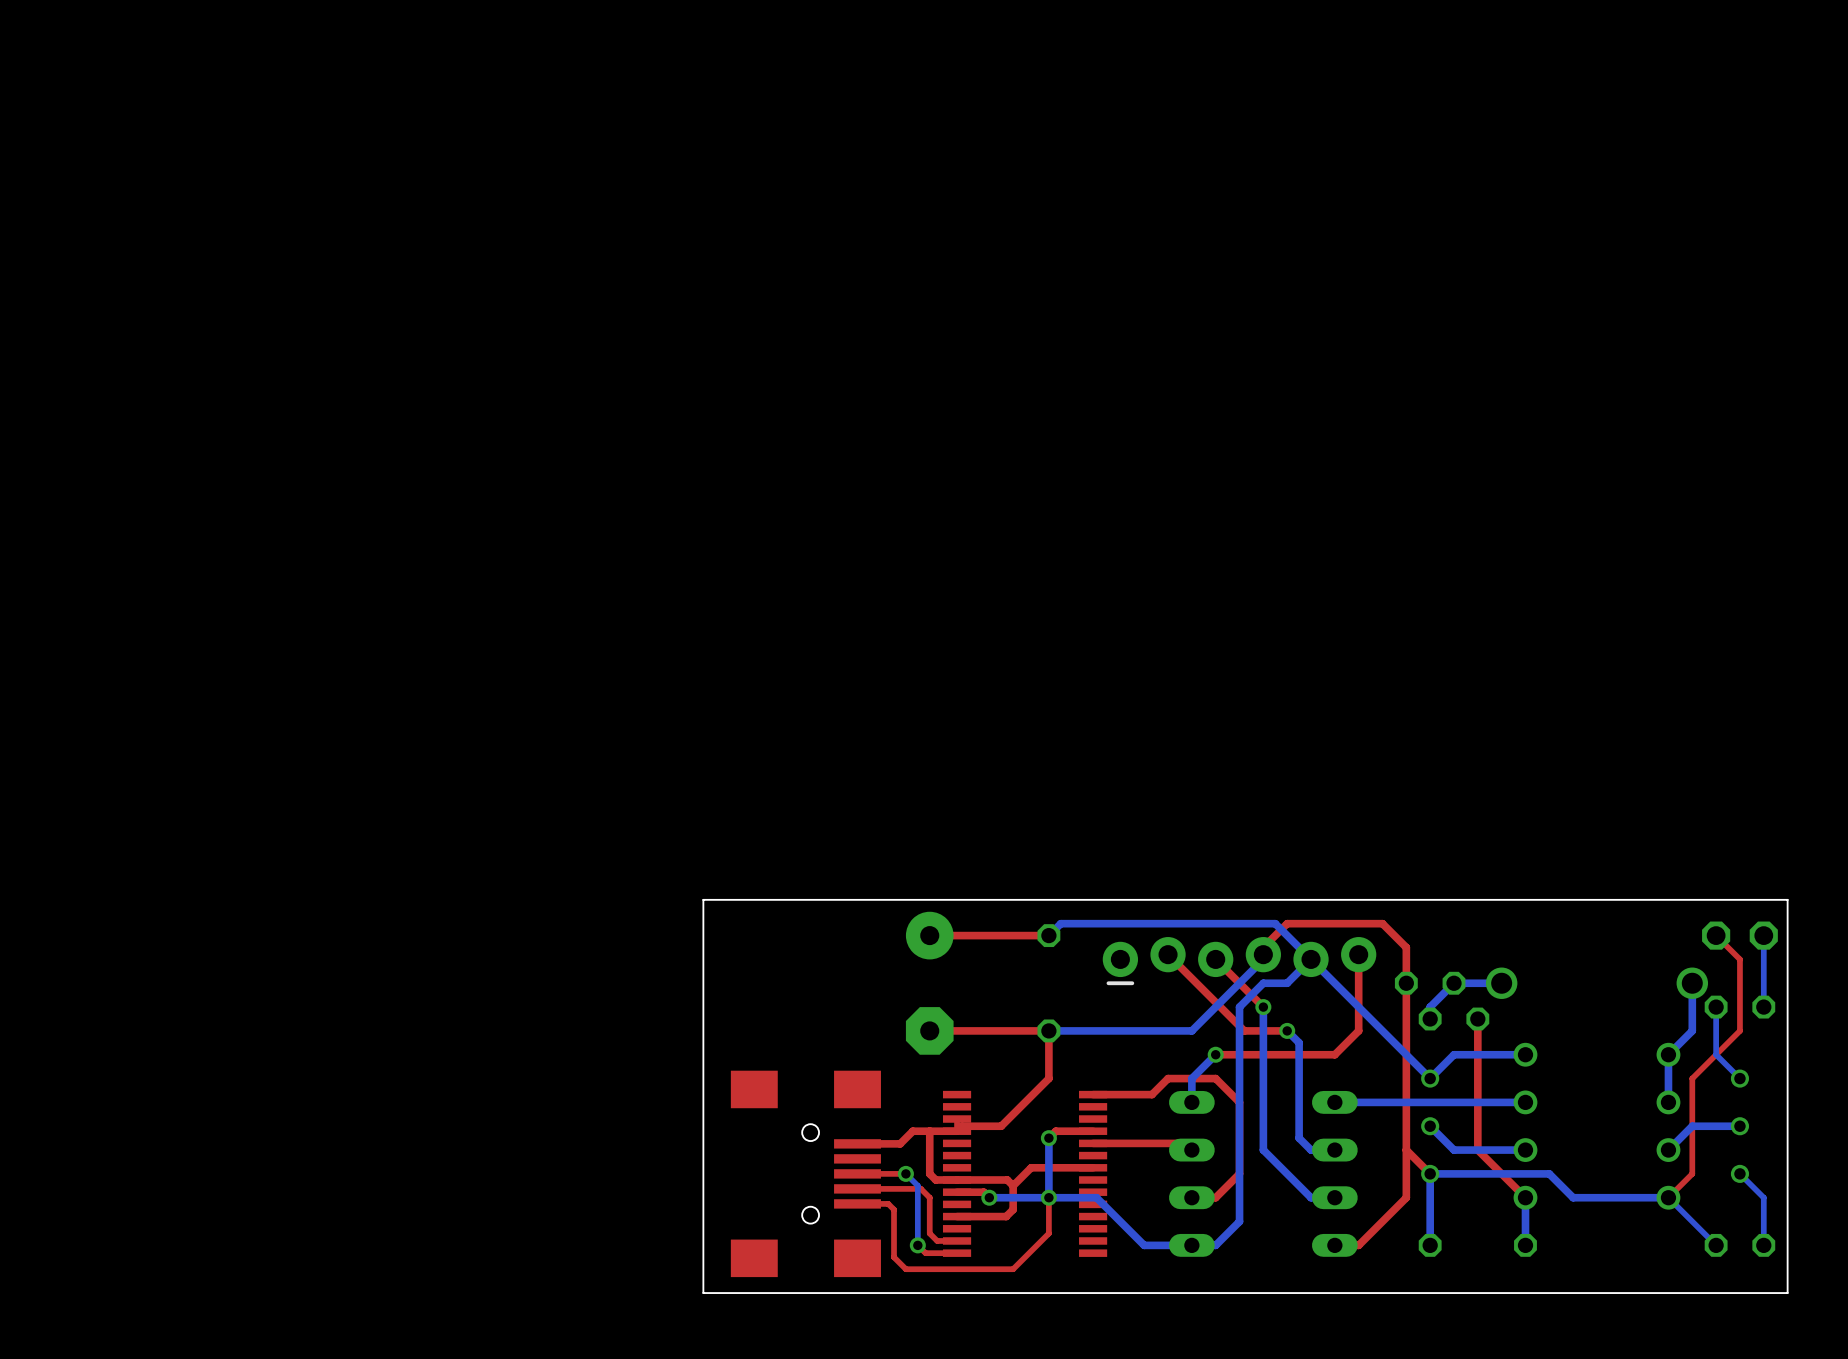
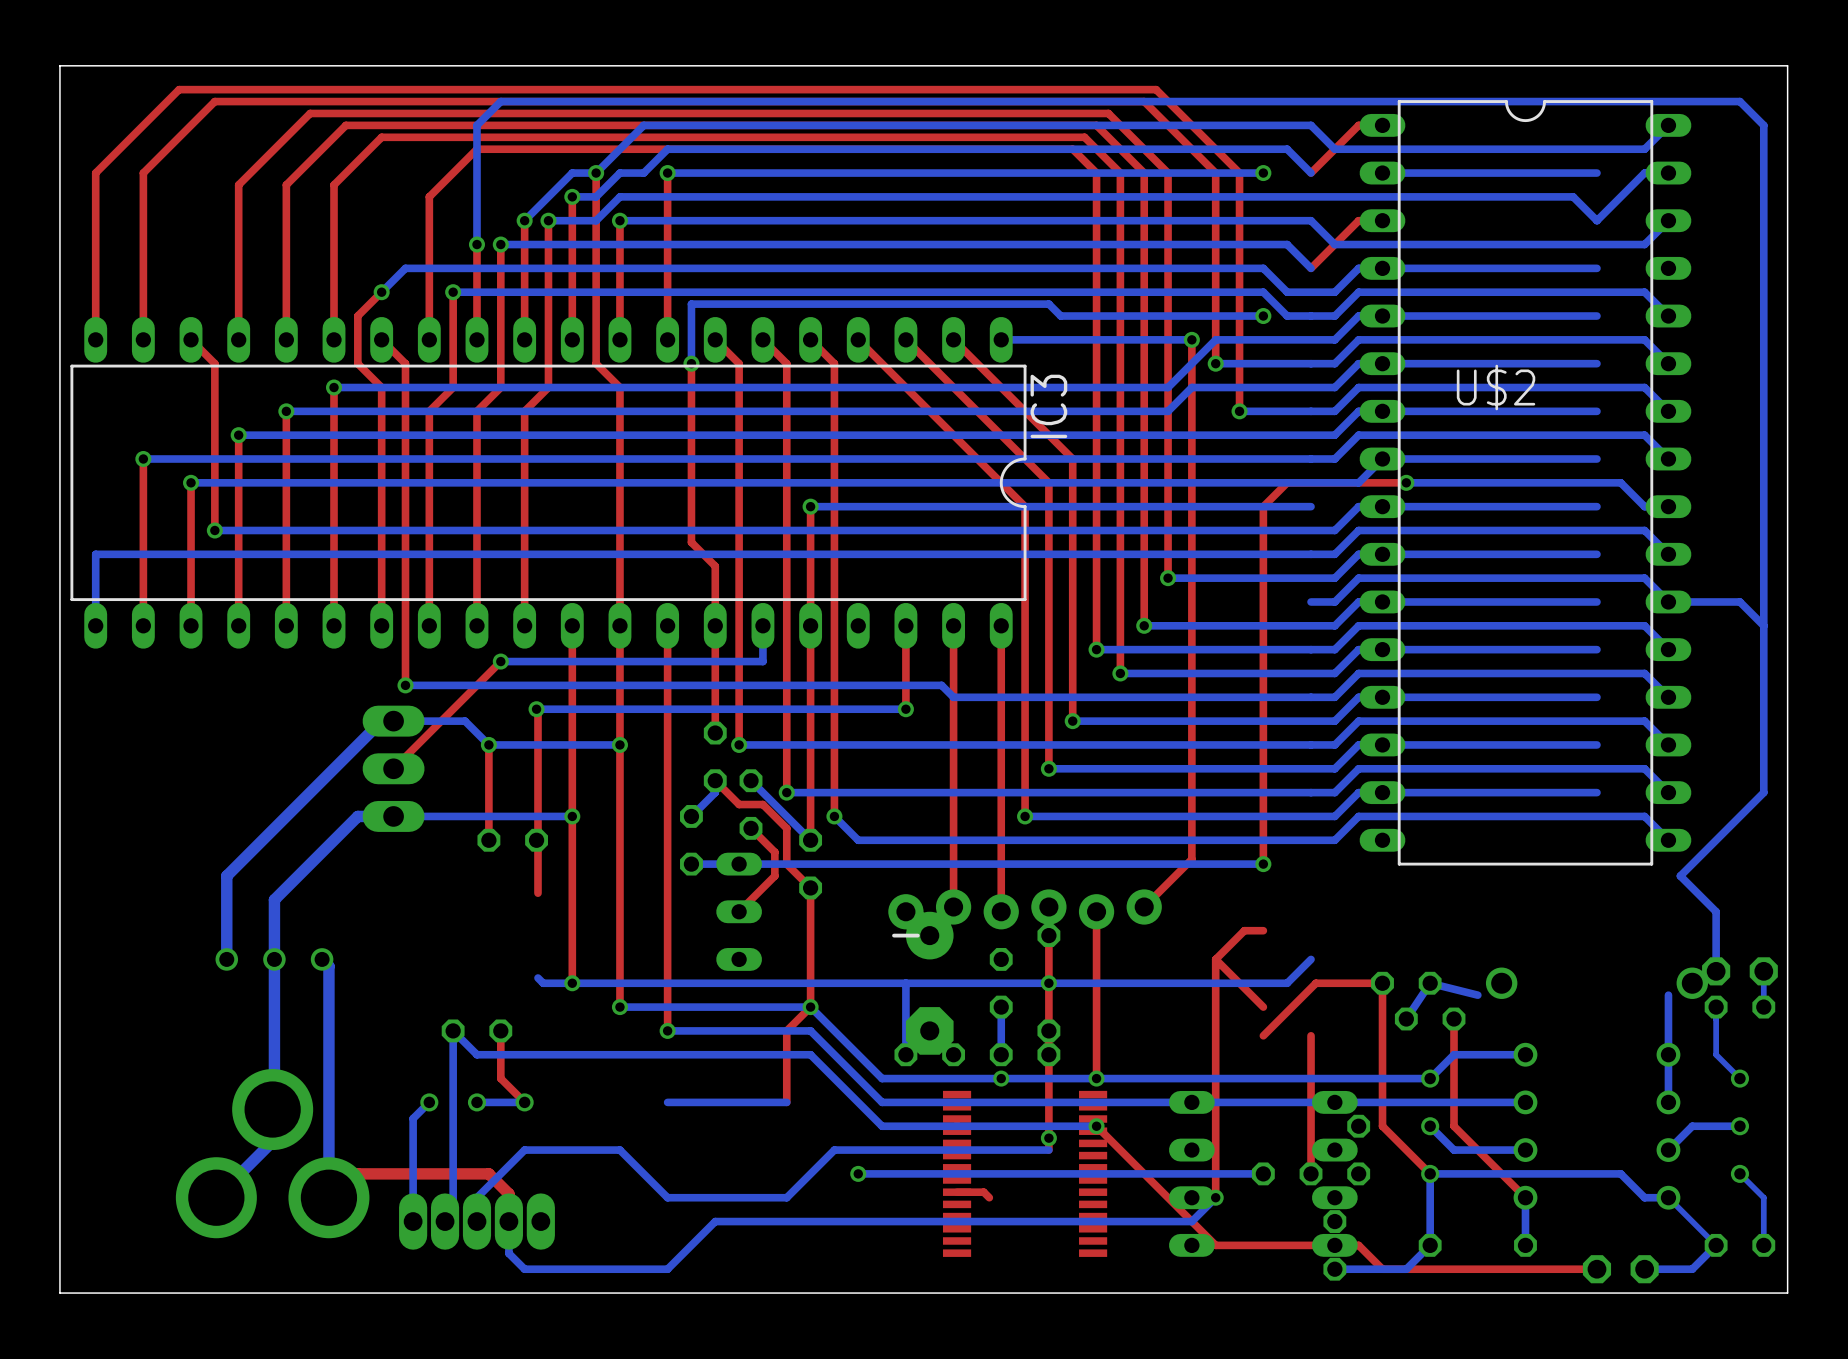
top track: none -> (1382, 125) (1358, 125) (1311, 173)
bottom track: none -> (1668, 125) (1644, 149) (1334, 149) (1311, 125) (643, 125) (596, 173) (572, 173) (524, 220)
top track: none -> (596, 173) (596, 363) (619, 387) (619, 1007)
via: none -> (596, 173)
top track: none -> (667, 173) (667, 339)
via: none -> (667, 173)
bottom track: none -> (1263, 173) (667, 173)
via: none -> (1263, 173)
bottom track: none -> (1311, 173) (1287, 149) (667, 149) (643, 173) (619, 173) (596, 196) (572, 196)
bottom track: none -> (1596, 173) (1382, 173)
bottom track: none -> (1668, 173) (1644, 173) (1596, 220) (1573, 196) (619, 196) (596, 220) (548, 220)
top track: none -> (572, 196) (572, 339)
via: none -> (572, 196)
top track: none -> (524, 220) (524, 339)
via: none -> (524, 220)
top track: none -> (548, 220) (548, 387) (524, 411) (524, 625)
via: none -> (548, 220)
top track: none -> (619, 220) (619, 339)
via: none -> (619, 220)
top track: none -> (1382, 220) (1358, 220) (1311, 268)
bottom track: none -> (1668, 220) (1644, 244) (1334, 244) (1311, 220) (619, 220)
bottom track: none -> (476, 244) (476, 125) (500, 101) (1739, 101) (1763, 125) (1763, 792) (1680, 876) (1716, 911) (1716, 971)
top track: none -> (476, 244) (476, 339)
via: none -> (476, 244)
bottom track: none -> (500, 244) (1287, 244) (1311, 268)
top track: none -> (500, 244) (500, 387) (476, 411) (476, 625)
via: none -> (500, 244)
bottom track: none -> (1596, 268) (1358, 268) (1334, 292) (1287, 292) (1263, 268) (405, 268) (381, 292)
top track: none -> (381, 292) (357, 316) (357, 363) (381, 387) (381, 625)
via: none -> (381, 292)
bottom track: none -> (453, 292) (1263, 292) (1287, 316) (1334, 316) (1358, 292) (1644, 292) (1668, 316)
top track: none -> (453, 292) (453, 387) (429, 411) (429, 625)
via: none -> (453, 292)
bottom track: none -> (1263, 316) (1060, 316) (1048, 304) (691, 304) (691, 363)
via: none -> (1263, 316)
bottom track: none -> (1596, 316) (1358, 316) (1334, 339) (1215, 339) (1168, 387) (334, 387)
top track: none -> (95, 339) (95, 173) (179, 89) (1156, 89) (1239, 173) (1239, 411)
top track: none -> (143, 339) (143, 173) (214, 101) (1144, 101) (1215, 173) (1215, 363)
top track: none -> (191, 339) (214, 363) (214, 530)
top track: none -> (238, 339) (238, 184) (310, 113) (1108, 113) (1168, 173) (1168, 578)
top track: none -> (286, 339) (286, 184) (345, 125) (1096, 125) (1144, 173) (1144, 625)
top track: none -> (334, 339) (334, 184) (381, 137) (1084, 137) (1120, 173) (1120, 673)
top track: none -> (381, 339) (405, 363) (405, 685)
top track: none -> (429, 339) (429, 196) (476, 149) (1072, 149) (1096, 173) (1096, 649)
top track: none -> (715, 339) (739, 363) (739, 744)
top track: none -> (762, 339) (786, 363) (786, 792)
top track: none -> (810, 339) (834, 363) (834, 816)
top track: none -> (858, 339) (1025, 506) (1025, 816)
top track: none -> (905, 339) (1048, 482) (1048, 768)
top track: none -> (953, 339) (1072, 459) (1072, 721)
bottom track: none -> (1191, 339) (1001, 339)
top track: none -> (1191, 339) (1191, 859) (1144, 907)
via: none -> (1191, 339)
top track: none -> (691, 363) (691, 542) (715, 566) (715, 733)
via: none -> (691, 363)
via: none -> (1215, 363)
bottom track: none -> (1596, 363) (1358, 363) (1334, 387) (1191, 387) (1168, 411) (286, 411)
bottom track: none -> (1668, 363) (1644, 339) (1358, 339) (1334, 363) (1215, 363)
top track: none -> (334, 387) (334, 625)
via: none -> (334, 387)
top track: none -> (286, 411) (286, 625)
via: none -> (286, 411)
via: none -> (1239, 411)
bottom track: none -> (1596, 411) (1358, 411) (1334, 435) (238, 435)
bottom track: none -> (1668, 411) (1644, 387) (1358, 387) (1334, 411) (1239, 411)
top track: none -> (238, 435) (238, 625)
via: none -> (238, 435)
top track: none -> (143, 459) (143, 625)
via: none -> (143, 459)
bottom track: none -> (1596, 459) (1382, 459) (1358, 482) (191, 482)
bottom track: none -> (1668, 459) (1644, 435) (1358, 435) (1334, 459) (143, 459)
top track: none -> (191, 482) (191, 625)
via: none -> (191, 482)
IC3: none -> (548, 482)
bottom track: none -> (1406, 482) (1620, 482) (1644, 506) (1668, 506)
top track: none -> (1406, 482) (1287, 482) (1263, 506) (1263, 864)
via: none -> (1406, 482)
U$2: none -> (1525, 482)
top track: none -> (810, 506) (810, 840)
via: none -> (810, 506)
bottom track: none -> (1311, 506) (810, 506)
bottom track: none -> (1596, 506) (1358, 506) (1334, 530) (214, 530)
via: none -> (214, 530)
bottom track: none -> (1596, 554) (1358, 554) (1334, 578) (1168, 578)
bottom track: none -> (1668, 554) (1644, 530) (1358, 530) (1334, 554) (95, 554) (95, 625)
via: none -> (1168, 578)
bottom track: none -> (1311, 601) (1334, 601) (1358, 578) (1644, 578) (1668, 601) (1739, 601) (1763, 625)
bottom track: none -> (1596, 601) (1358, 601) (1334, 625) (1144, 625)
top track: none -> (572, 625) (572, 983)
top track: none -> (667, 625) (667, 1030)
bottom track: none -> (762, 625) (762, 661) (500, 661)
top track: none -> (905, 625) (905, 709)
top track: none -> (953, 625) (953, 907)
top track: none -> (1001, 625) (1001, 911)
via: none -> (1144, 625)
via: none -> (1096, 649)
bottom track: none -> (1596, 649) (1358, 649) (1334, 673) (1120, 673)
bottom track: none -> (1668, 649) (1644, 625) (1358, 625) (1334, 649) (1096, 649)
top track: none -> (500, 661) (393, 768)
via: none -> (500, 661)
via: none -> (1120, 673)
bottom track: none -> (405, 685) (941, 685) (953, 697) (1334, 697) (1358, 673) (1644, 673) (1668, 697)
via: none -> (405, 685)
bottom track: none -> (1596, 697) (1358, 697) (1334, 721) (1072, 721)
top track: none -> (536, 709) (537, 893)
via: none -> (536, 709)
bottom track: none -> (905, 709) (536, 709)
via: none -> (905, 709)
via: none -> (1072, 721)
top track: none -> (488, 744) (488, 840)
via: none -> (488, 744)
bottom track: none -> (619, 744) (488, 744) (465, 721) (381, 721) (226, 876) (226, 959)
via: none -> (619, 744)
via: none -> (739, 744)
bottom track: none -> (1596, 744) (1358, 744) (1334, 768) (1048, 768)
bottom track: none -> (1668, 744) (1644, 721) (1358, 721) (1334, 744) (739, 744)
part: none -> (715, 756)
part: none -> (393, 768)
via: none -> (1048, 768)
bottom track: none -> (715, 780) (715, 792) (691, 816)
top track: none -> (715, 780) (739, 804) (762, 804) (786, 828) (786, 864) (810, 887) (810, 1007) (786, 1030) (786, 1102)
bottom track: none -> (751, 780) (810, 840)
via: none -> (786, 792)
bottom track: none -> (1596, 792) (1358, 792) (1334, 816) (1025, 816)
bottom track: none -> (1668, 792) (1644, 768) (1358, 768) (1334, 792) (786, 792)
part: none -> (751, 804)
bottom track: none -> (572, 816) (357, 816) (274, 899) (274, 1107) (272, 1109) (272, 1141) (216, 1197)
via: none -> (572, 816)
bottom track: none -> (834, 816) (858, 840) (1334, 840) (1358, 816) (1644, 816) (1668, 840)
via: none -> (834, 816)
via: none -> (1025, 816)
top track: none -> (751, 828) (774, 852) (774, 876) (739, 911)
part: none -> (512, 840)
part: none -> (691, 840)
part: none -> (810, 864)
bottom track: none -> (1263, 864) (691, 864)
via: none -> (1263, 864)
board edge: (1787, 899) (703, 899) (703, 1293) -> (1787, 899) (1787, 65) (59, 65) (59, 1293) (703, 1293)
part: none -> (739, 911)
top track: none -> (1096, 911) (1096, 1078)
top track: none -> (1263, 930) (1244, 930) (1215, 959) (1215, 1197)
bottom track: (1048, 935) (1060, 923) (1275, 923) (1430, 1078) -> (619, 1007) (810, 1007) (882, 1078) (1430, 1078)
top track: (1048, 935) (929, 935) -> none
top track: (1716, 935) (1739, 959) (1739, 1030) (1692, 1078) (1692, 1173) (1668, 1197) -> none
part position: (1739, 935) -> (1739, 971)
bottom track: (1763, 935) (1763, 971) -> none
top track: (1168, 954) (1244, 1030) (1287, 1030) -> none
bottom track: (1263, 954) (1263, 959) (1191, 1030) (1048, 1030) -> none
top track: (1263, 954) (1263, 947) (1287, 923) (1382, 923) (1406, 947) (1406, 1197) (1358, 1245) -> (1596, 1269) (1382, 1269) (1358, 1245)
top track: (1358, 954) (1358, 1030) (1334, 1054) (1215, 1054) -> none
part: none -> (274, 959)
bottom track: none -> (322, 959) (328, 966) (328, 1197)
part position: (1239, 961) -> (1025, 913)
via: none -> (572, 983)
bottom track: none -> (905, 983) (905, 1054)
part: none -> (1001, 983)
via: none -> (1048, 983)
bottom track: (1263, 983) (1239, 1007) (1239, 1221) (1215, 1245) (1144, 1245) (1096, 1197) (989, 1197) -> (1263, 983) (543, 983) (537, 978)
part: none -> (1406, 983)
part: (1430, 983) -> none
bottom track: (1501, 983) (1454, 983) (1430, 1007) (1430, 1019) -> none
bottom track: (1692, 983) (1692, 1030) (1668, 1054) -> (1668, 995) (1668, 1054)
bottom track: none -> (1477, 995) (1430, 983) (1406, 1019)
via: none -> (619, 1007)
via: none -> (810, 1007)
bottom track: none -> (1001, 1007) (1001, 1054)
bottom track: (1263, 1007) (1263, 1150) (1311, 1197) (1334, 1197) -> none
via: (1263, 1007) -> none
part: none -> (1430, 1019)
part: (1454, 1019) -> none
top track: (1477, 1019) (1477, 1150) -> (1454, 1019) (1454, 1126) (1477, 1150)
part: none -> (476, 1030)
top track: none -> (500, 1030) (500, 1078) (524, 1102)
bottom track: none -> (667, 1030) (810, 1030) (882, 1102) (1334, 1102)
via: none -> (667, 1030)
top track: (1048, 1030) (929, 1030) -> (1048, 1030) (1048, 907)
bottom track: (1287, 1030) (1299, 1042) (1299, 1138) (1311, 1150) (1334, 1150) -> none
via: (1287, 1030) -> none
top track: none -> (1263, 1035) (1315, 983) (1382, 983) (1382, 1126) (1406, 1150)
top track: none -> (1311, 1035) (1311, 1173)
part: none -> (929, 1054)
part: none -> (1025, 1054)
bottom track: (1215, 1054) (1191, 1078) (1191, 1102) -> none
via: (1215, 1054) -> none
via: none -> (1001, 1078)
top track: (1048, 1078) (1001, 1126) (962, 1126) (957, 1131) (912, 1131) (900, 1143) (857, 1143) -> (1048, 1078) (1048, 1150)
via: none -> (1096, 1078)
top track: (1093, 1094) (1152, 1094) (1168, 1078) (1215, 1078) (1239, 1102) (1239, 1173) (1215, 1197) (1191, 1197) -> none
bottom track: none -> (429, 1102) (413, 1118) (413, 1221)
part: none -> (476, 1102)
bottom track: none -> (524, 1102) (476, 1102)
bottom track: none -> (786, 1102) (667, 1102)
bottom track: none -> (1096, 1126) (882, 1126) (810, 1054) (476, 1054) (453, 1030) (453, 1213) (445, 1221)
top track: none -> (1096, 1126) (1215, 1245) (1334, 1245)
via: none -> (1096, 1126)
top track: (929, 1131) (929, 1173) (935, 1179) (1007, 1179) (1013, 1185) -> none
top track: (1093, 1131) (1055, 1131) (1048, 1138) -> none
bottom track: (1048, 1138) (1048, 1197) -> none
top track: (1093, 1143) (1185, 1143) (1191, 1150) -> none
bottom track: none -> (1048, 1150) (834, 1150) (786, 1197) (667, 1197) (619, 1150) (524, 1150) (476, 1197) (476, 1221)
part: none -> (1358, 1150)
part: none -> (272, 1153)
top track: (1093, 1167) (1031, 1167) (1013, 1185) -> none
part: (805, 1173) -> none
via: none -> (858, 1173)
bottom track: (905, 1173) (917, 1185) (917, 1245) -> none
via: (905, 1173) -> none
bottom track: none -> (1263, 1173) (858, 1173)
part: none -> (1287, 1173)
bottom track: (1549, 1173) (1573, 1197) (1644, 1197) -> (1549, 1173) (1620, 1173) (1644, 1197)
top track: (1013, 1185) (1013, 1209) (1006, 1216) (957, 1216) -> none
top track: (857, 1188) (920, 1188) (929, 1197) (929, 1233) (937, 1240) (957, 1240) -> none
top track: none -> (328, 1197) (334, 1197) (357, 1173) (488, 1173) (508, 1193) (508, 1221)
via: (989, 1197) -> none
top track: (1048, 1197) (1048, 1233) (1013, 1269) (905, 1269) (894, 1257) (894, 1209) (888, 1203) (857, 1203) -> none
via: (1048, 1197) -> none
bottom track: none -> (1215, 1197) (1191, 1221) (715, 1221) (667, 1269) (524, 1269) (508, 1253) (508, 1221)
via: none -> (1215, 1197)
part: none -> (476, 1221)
top track: (917, 1245) (925, 1253) (957, 1253) -> none
via: (917, 1245) -> none
part: none -> (1334, 1245)
bottom track: none -> (1430, 1245) (1406, 1269) (1334, 1269)
bottom track: none -> (1716, 1245) (1692, 1269) (1644, 1269)
part: none -> (1620, 1269)

